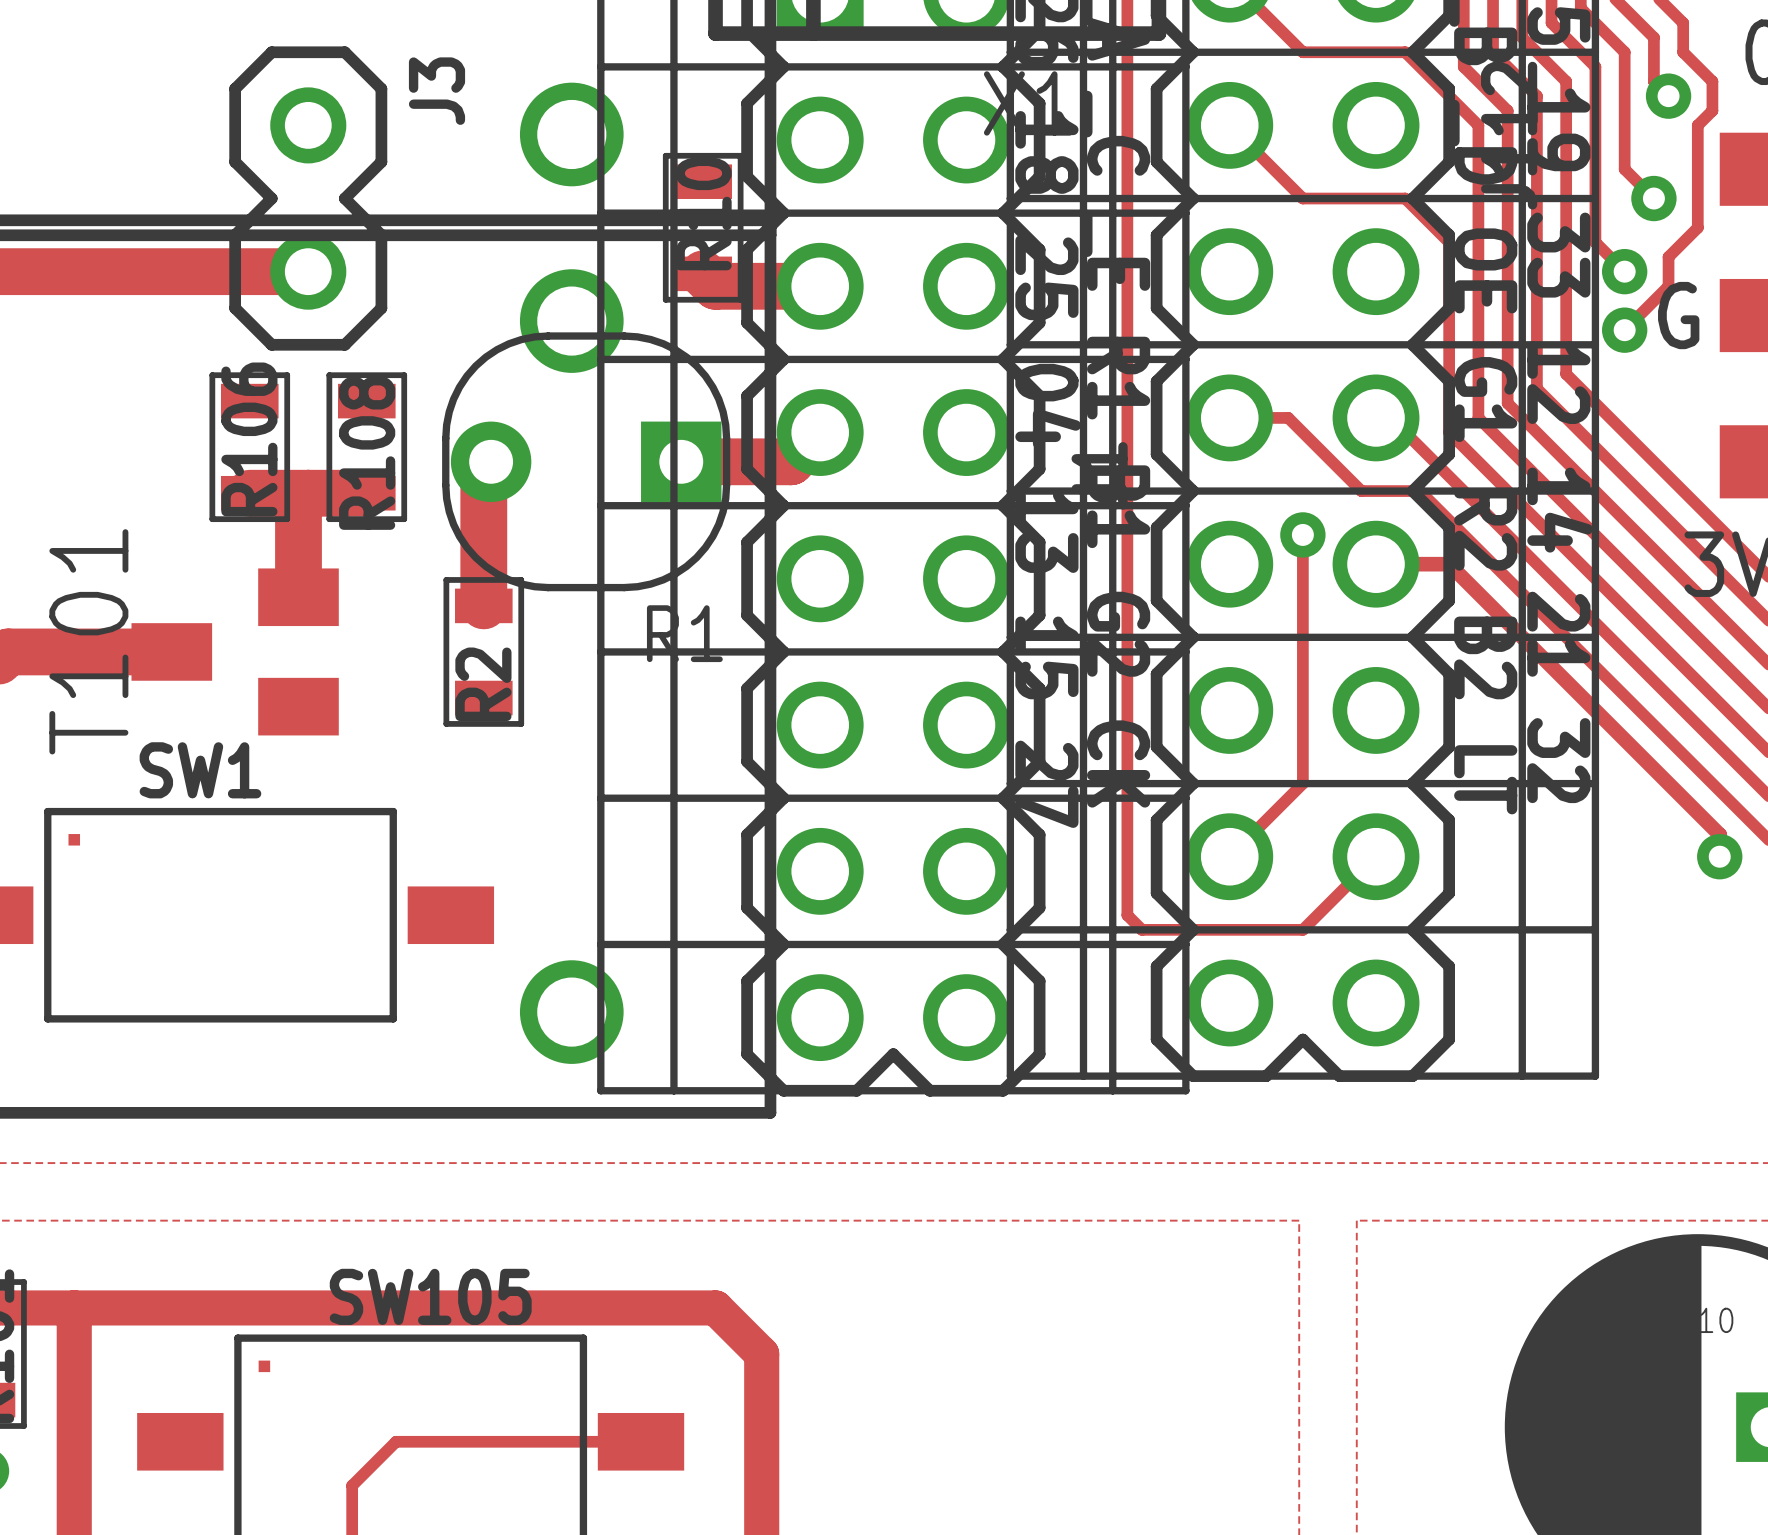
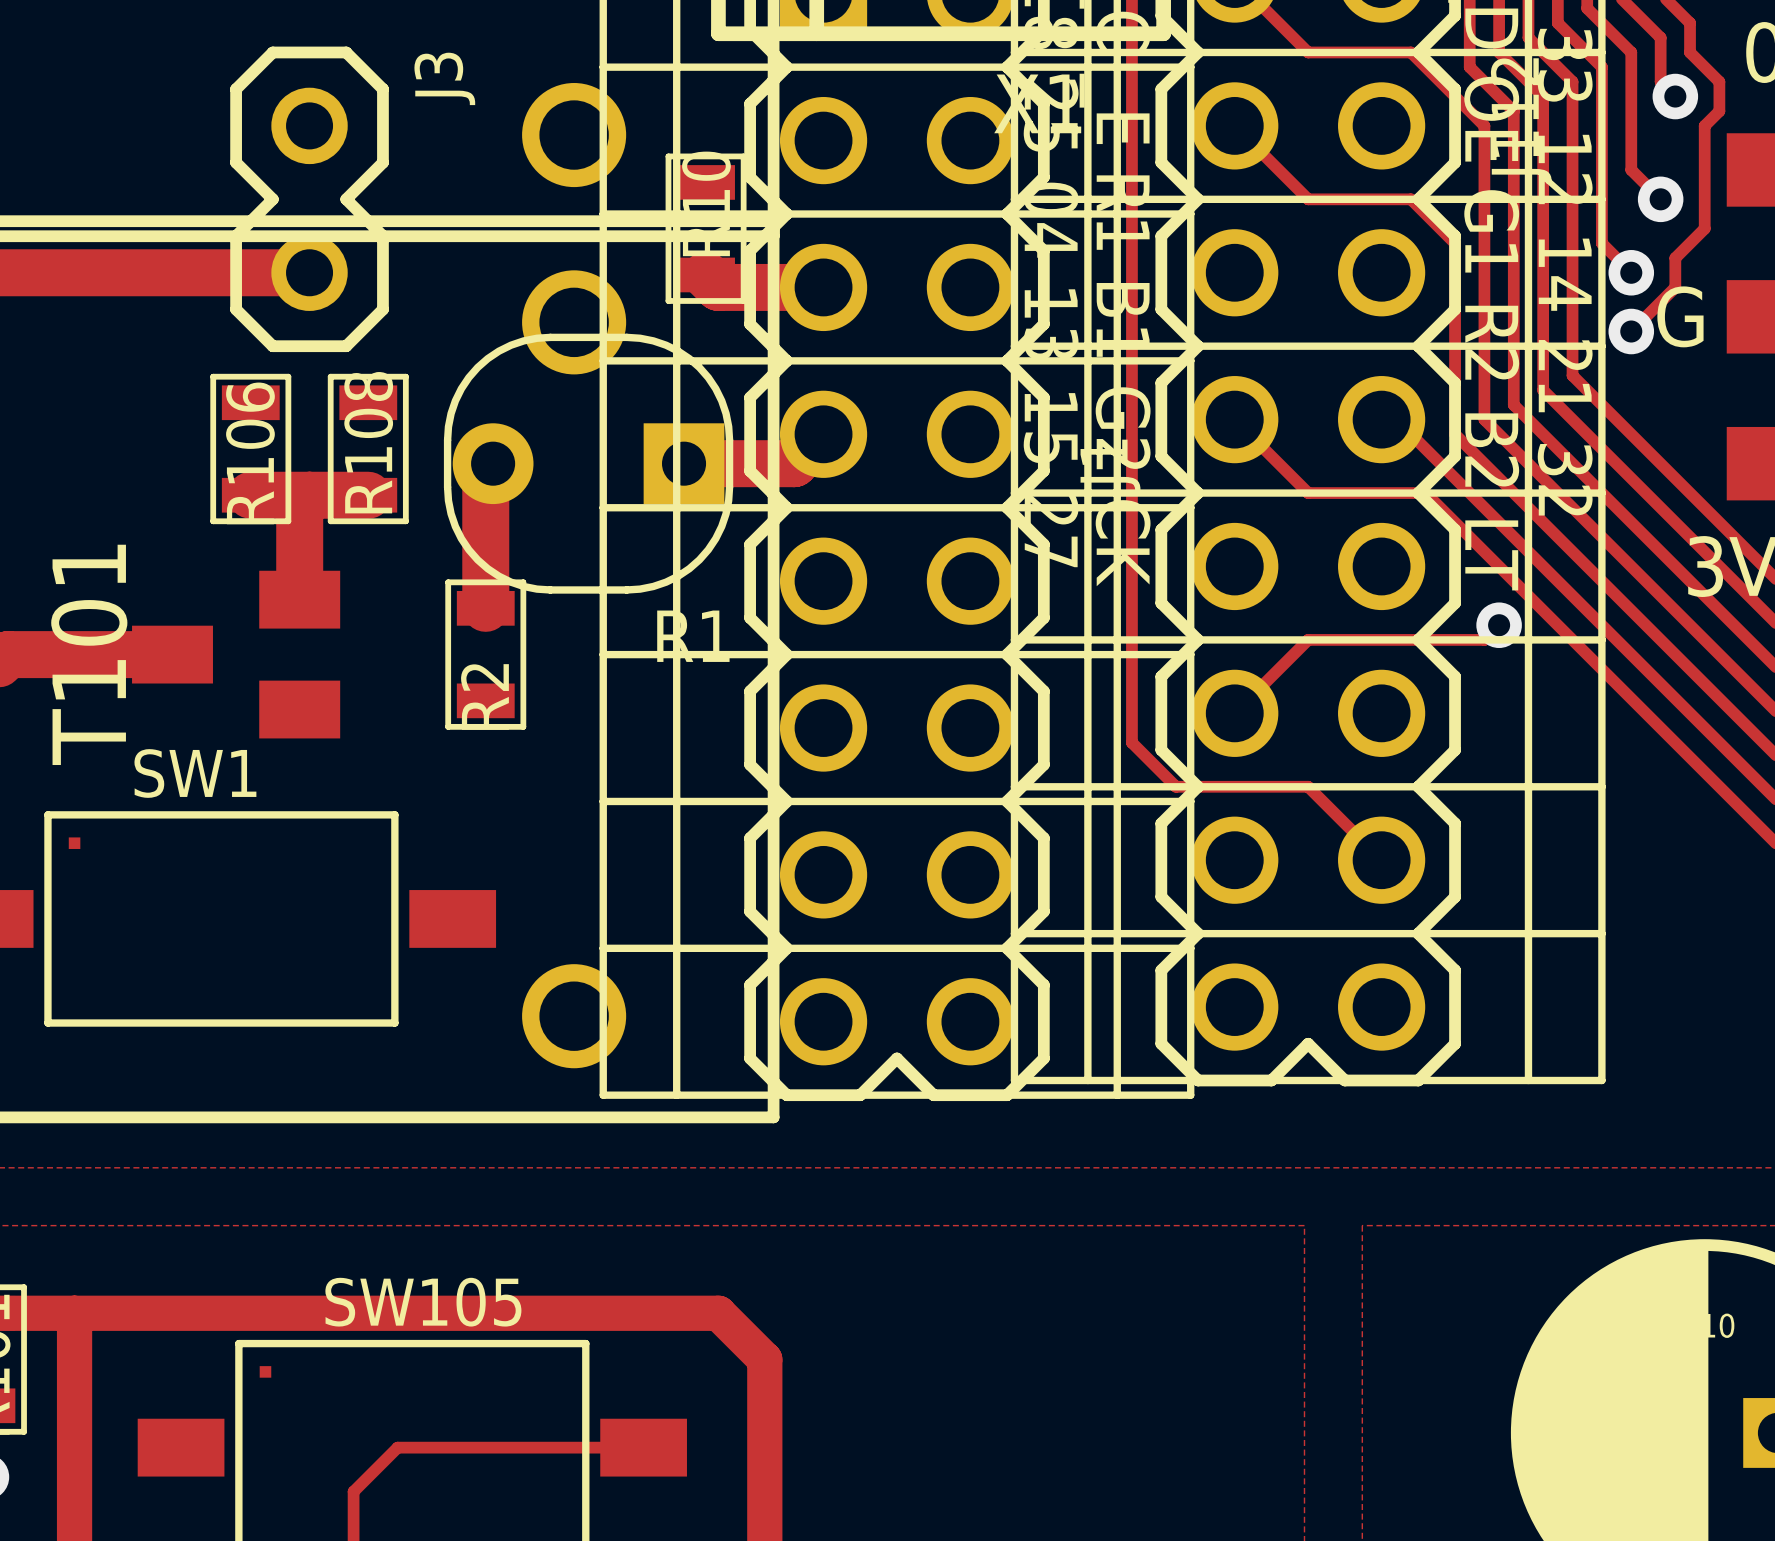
track: (1229, 417) (1288, 417) (1361, 491) -> (1234, 419) (1308, 493) (1366, 493)
track: (1302, 534) (1302, 783) (1229, 856) -> none
via: (1302, 534) -> none
track: (1376, 564) (1449, 564) (1719, 834) (1719, 856) -> none
track: none -> (1499, 625) (1484, 639) (1308, 639) (1234, 713)
via: none -> (1499, 625)
track: (1127, 739) (1127, 915) (1141, 929) (1302, 929) (1376, 856) -> (1131, 742) (1176, 786) (1308, 786) (1381, 860)
via: (1719, 856) -> none

